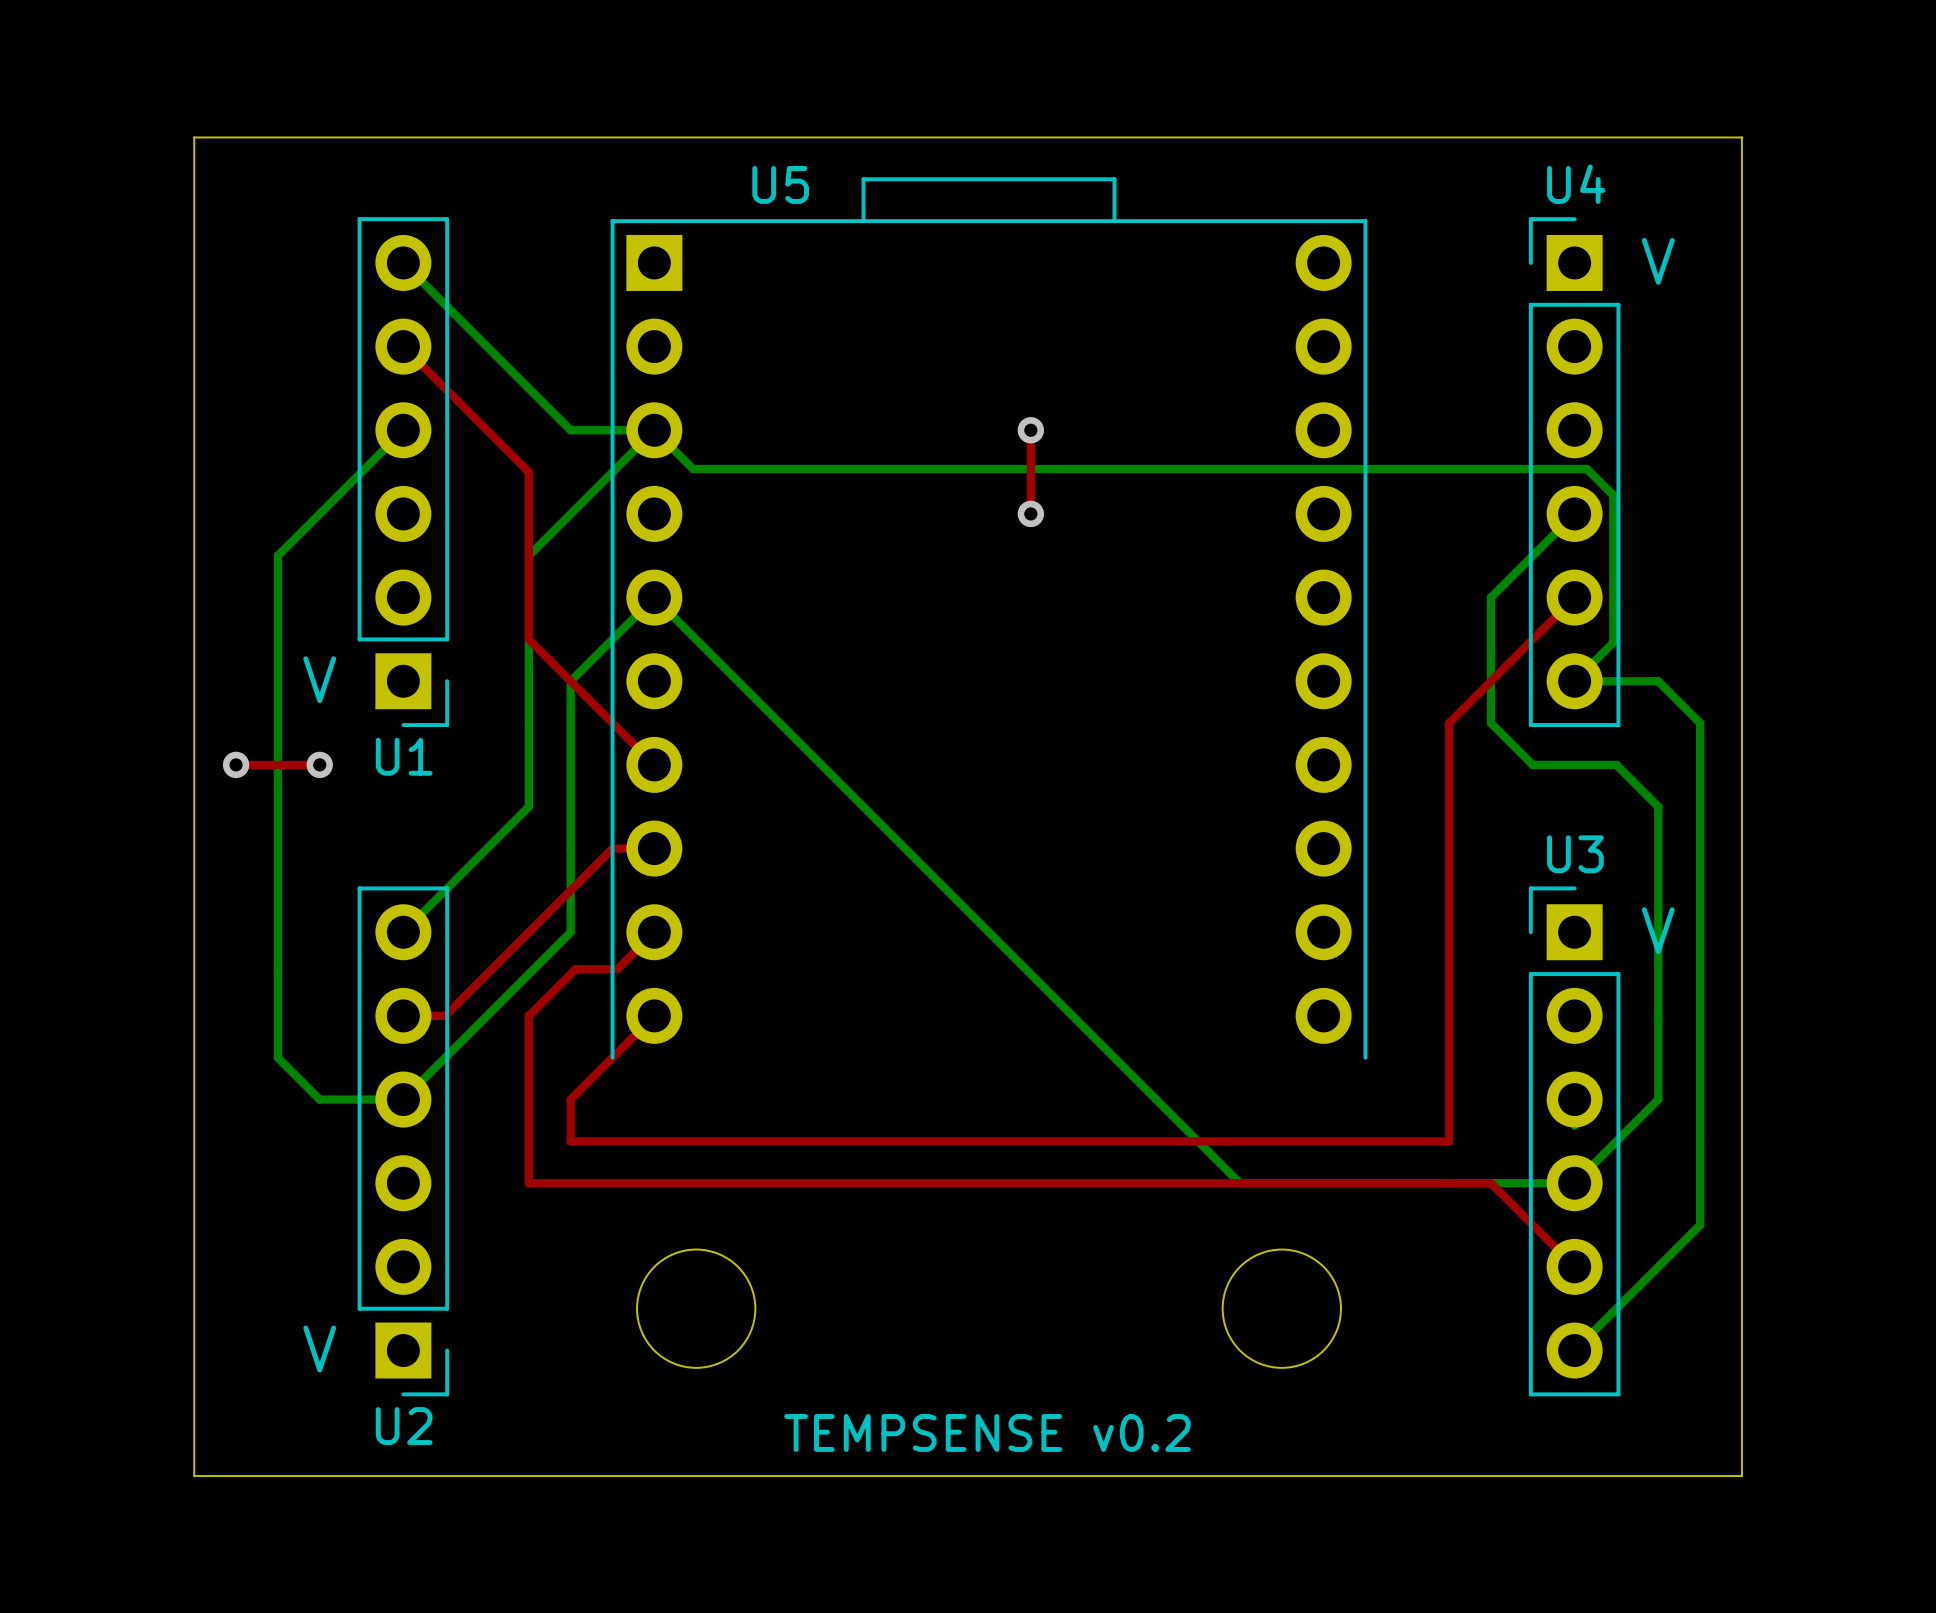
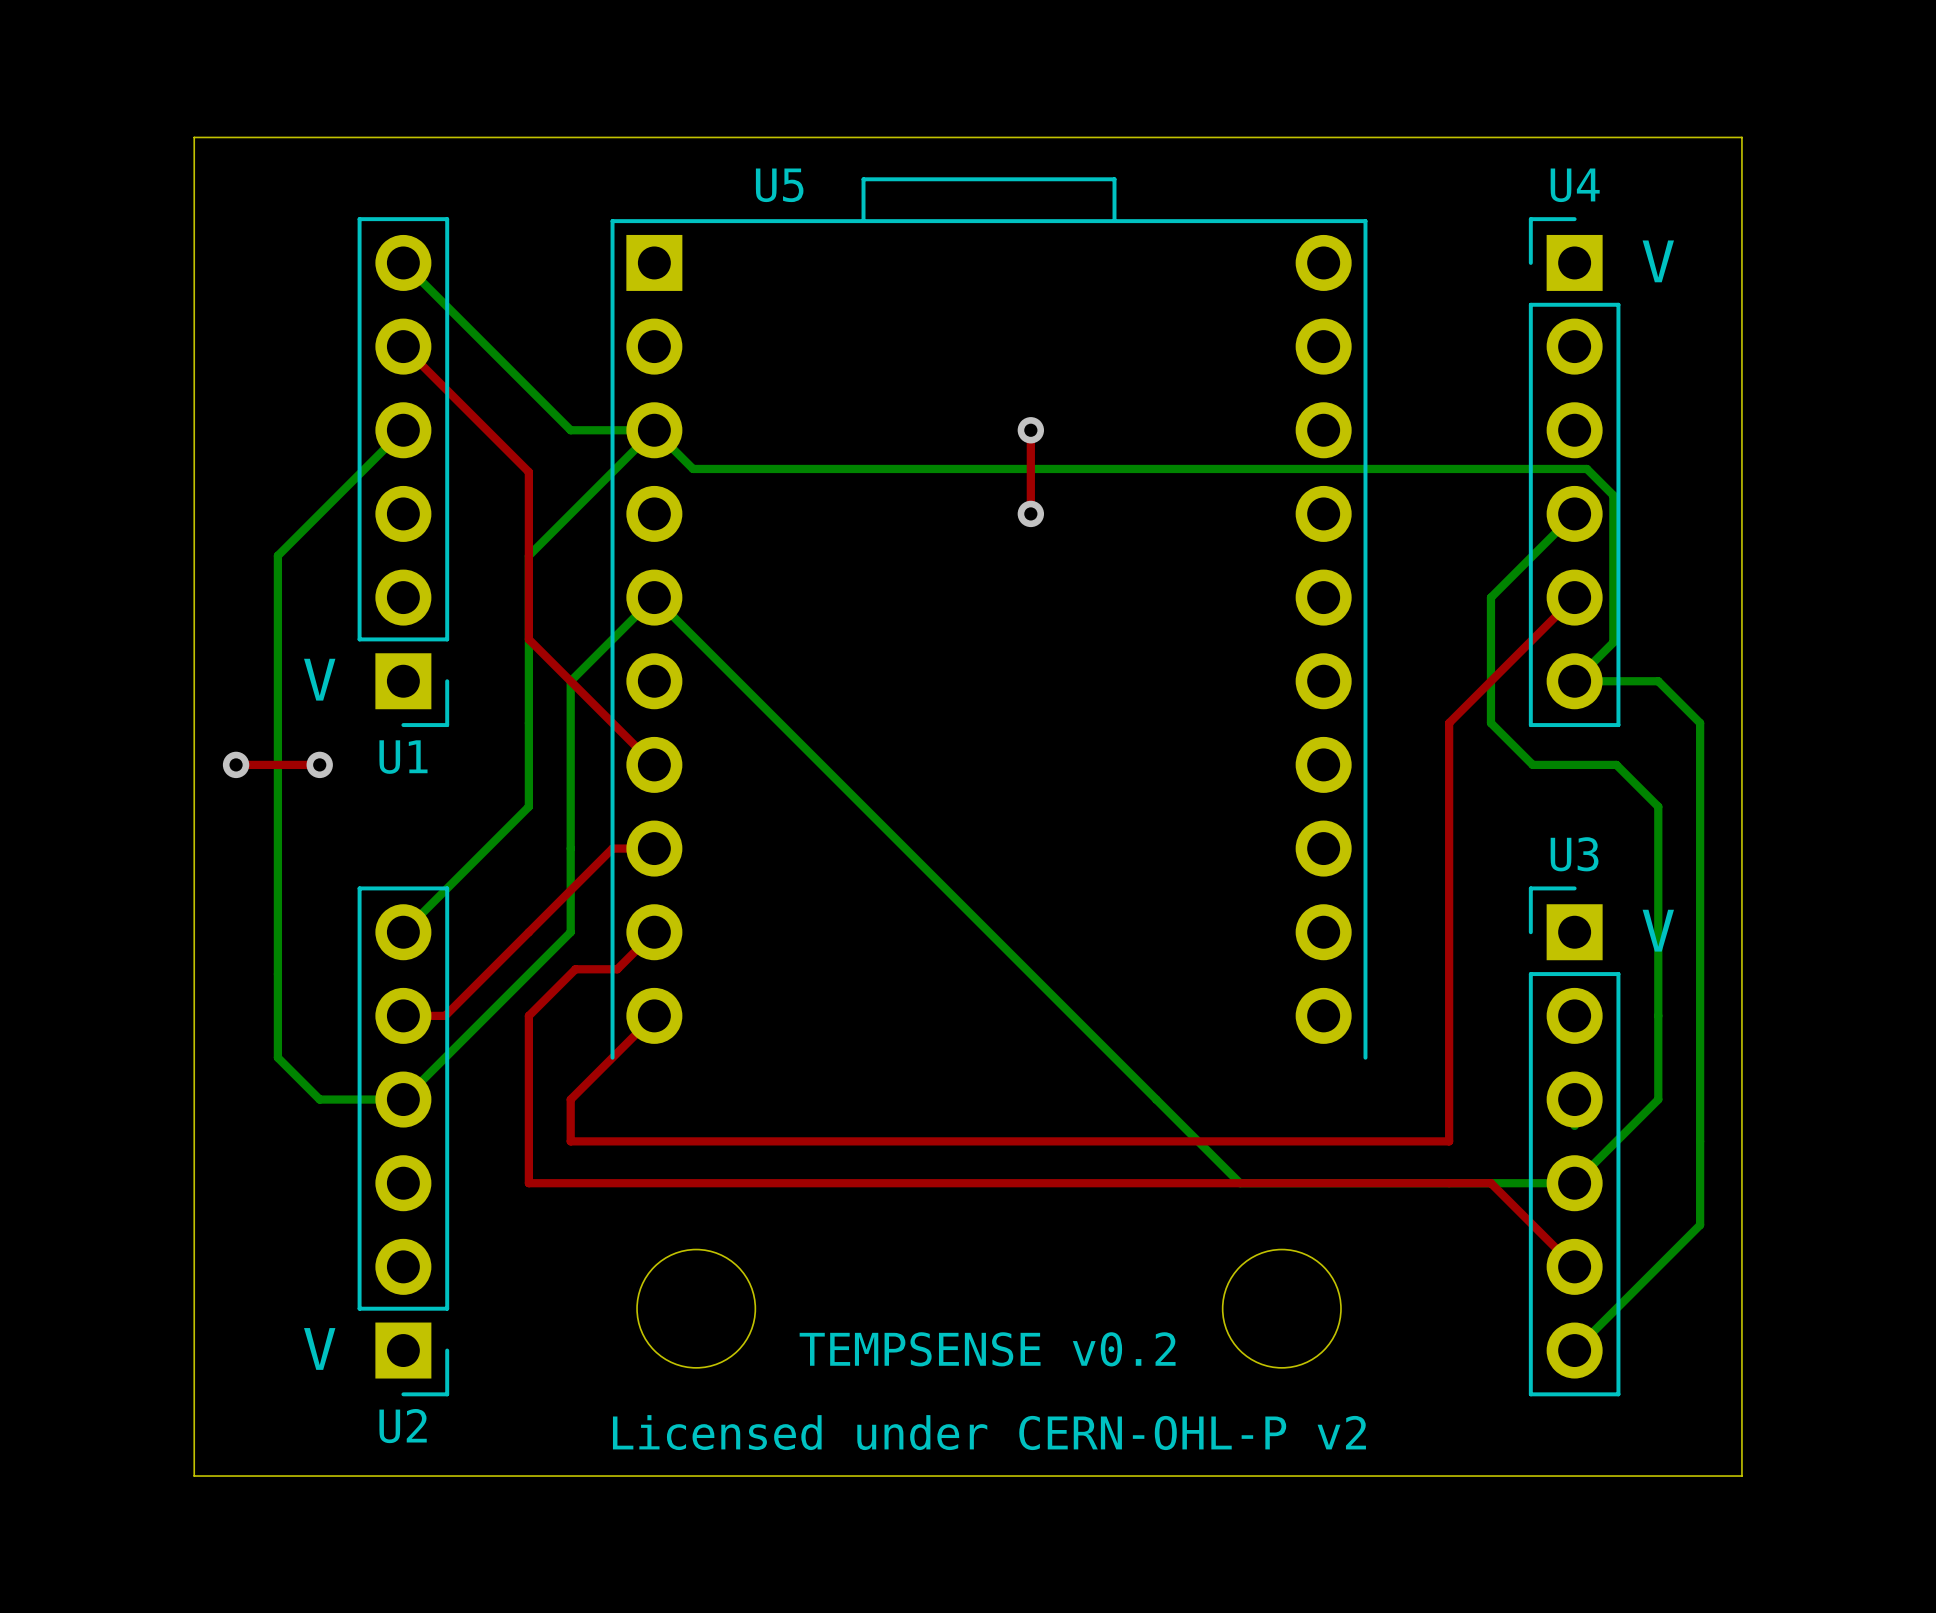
text: none -> TEMPSENSE v0.2 (987, 1349)
text: TEMPSENSE v0.2 (987, 1432) -> Licensed under CERN-OHL-P v2 (989, 1432)

